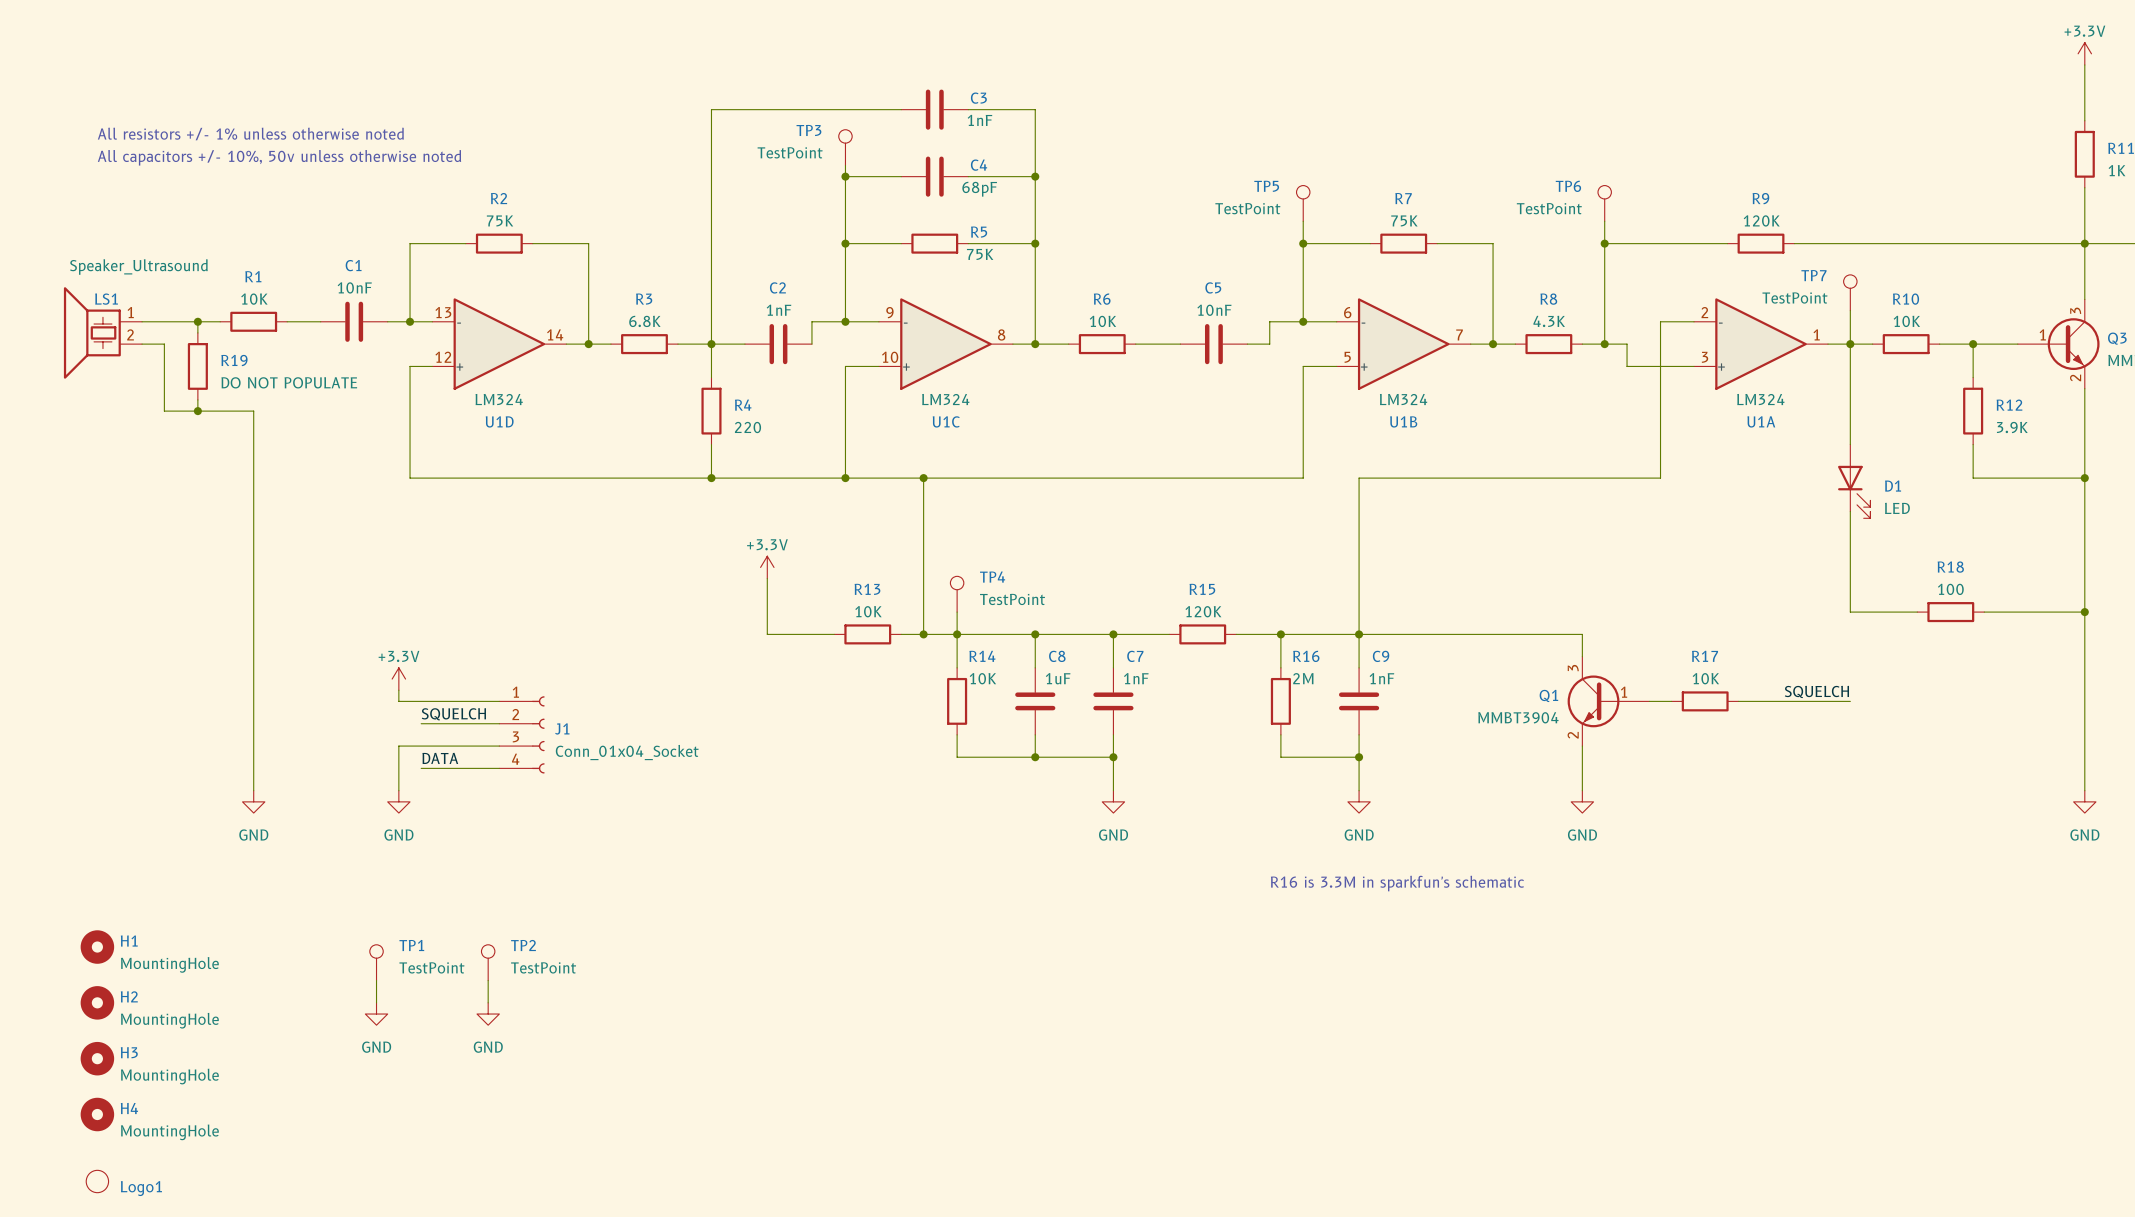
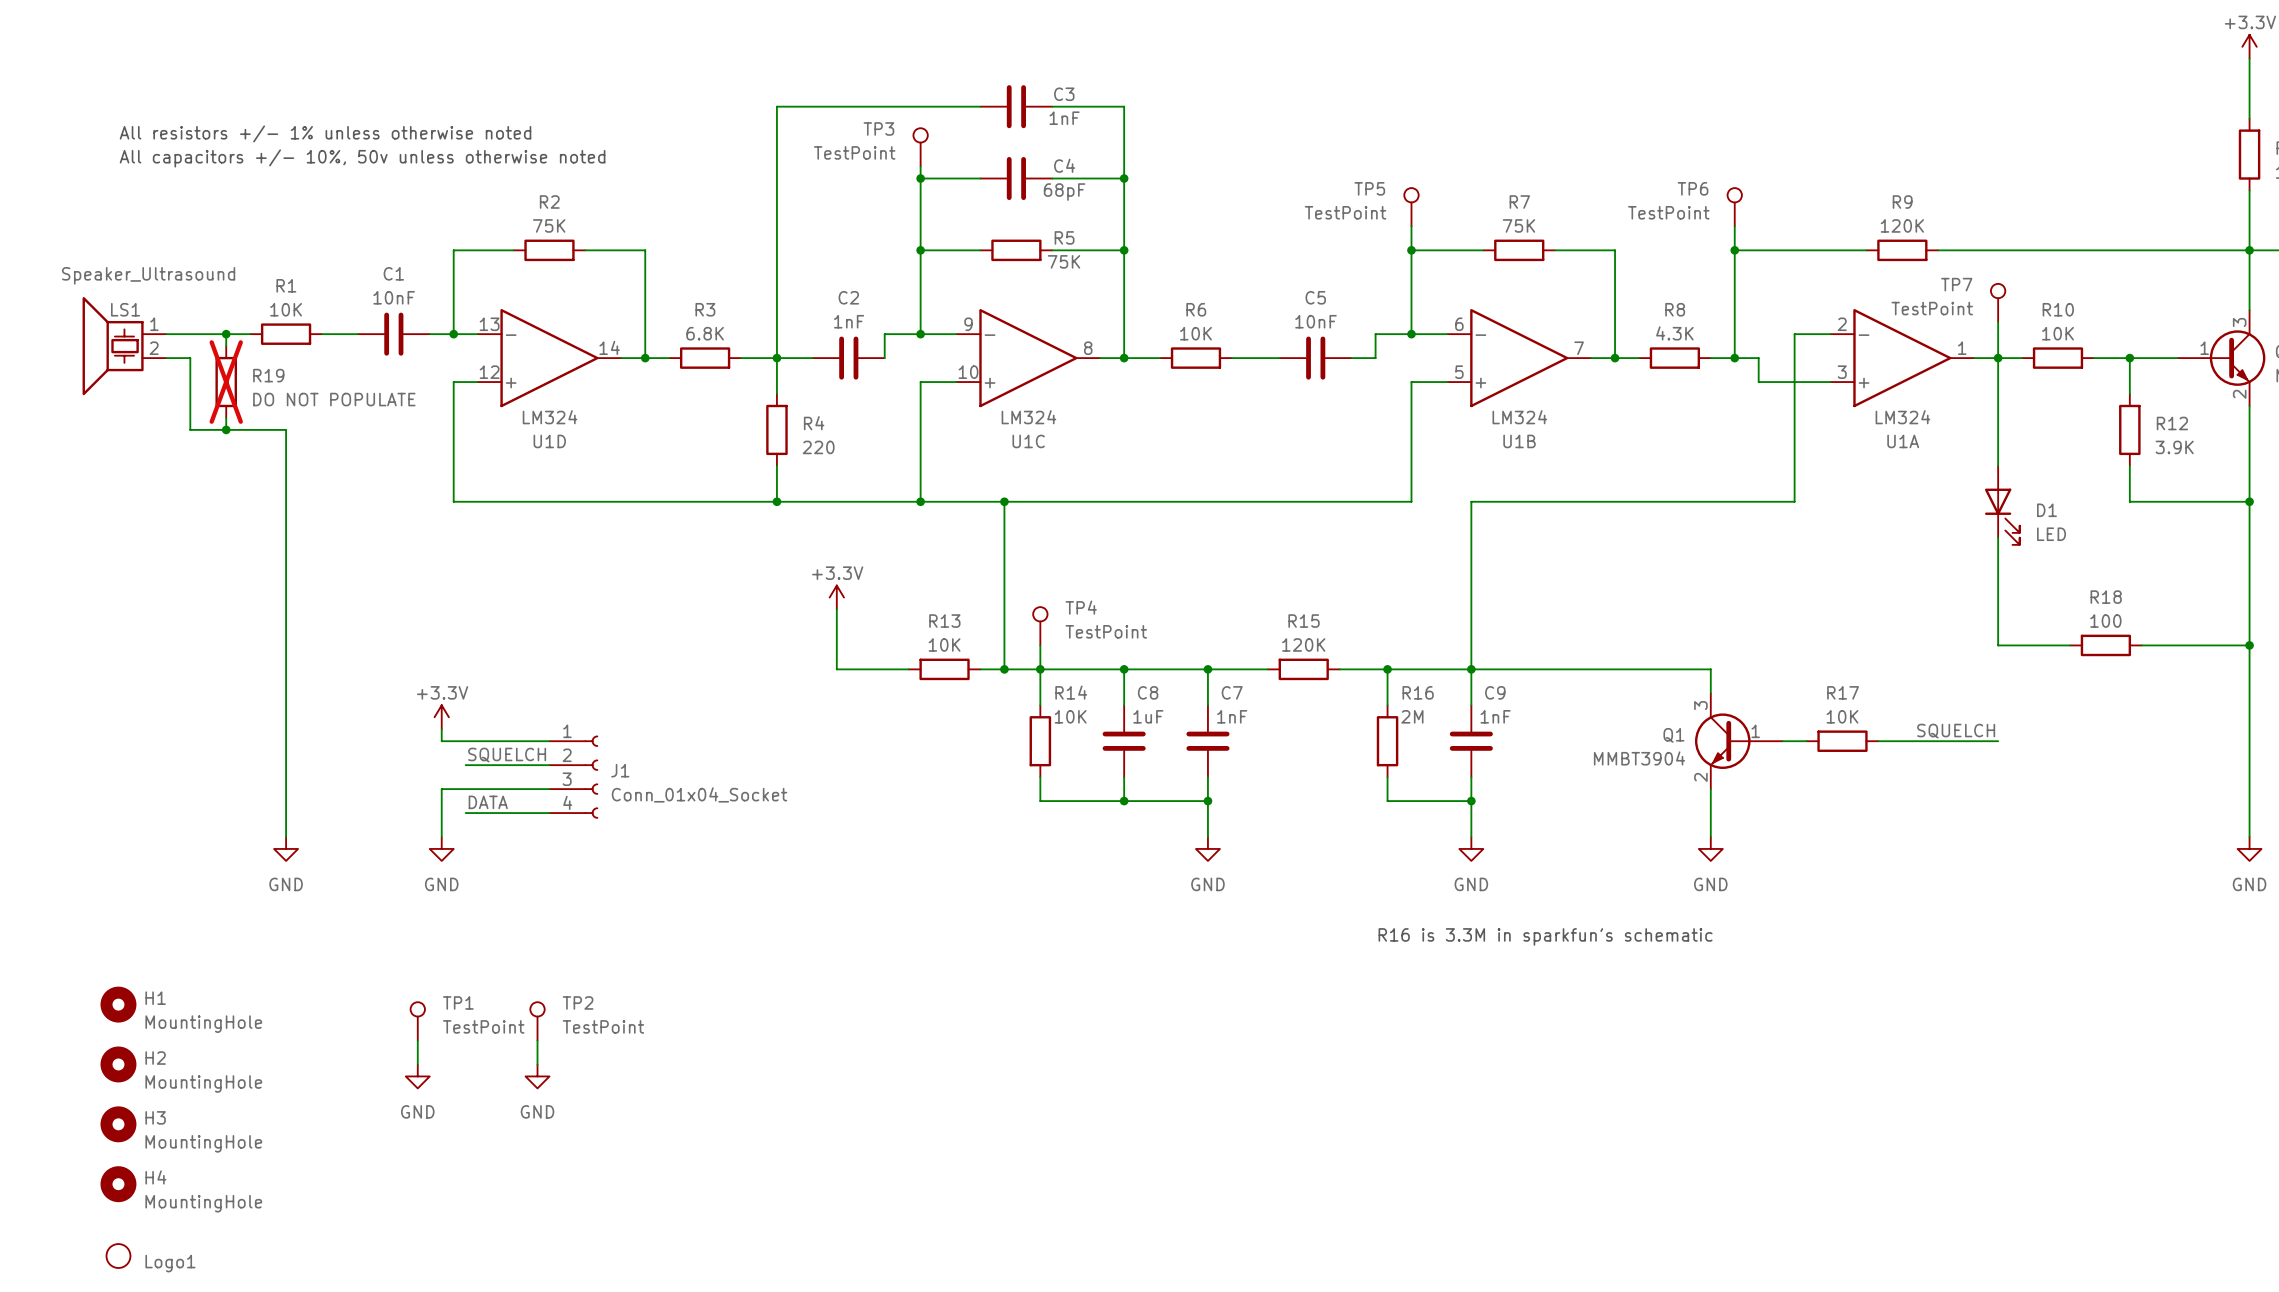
R19 do-not-place cross: none -> (226, 382)

